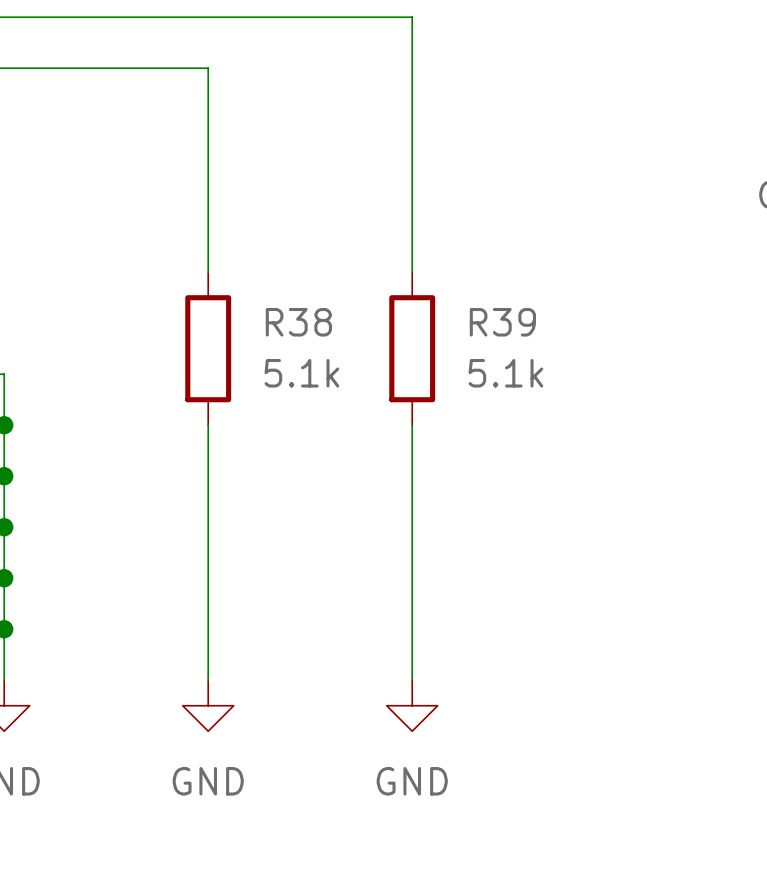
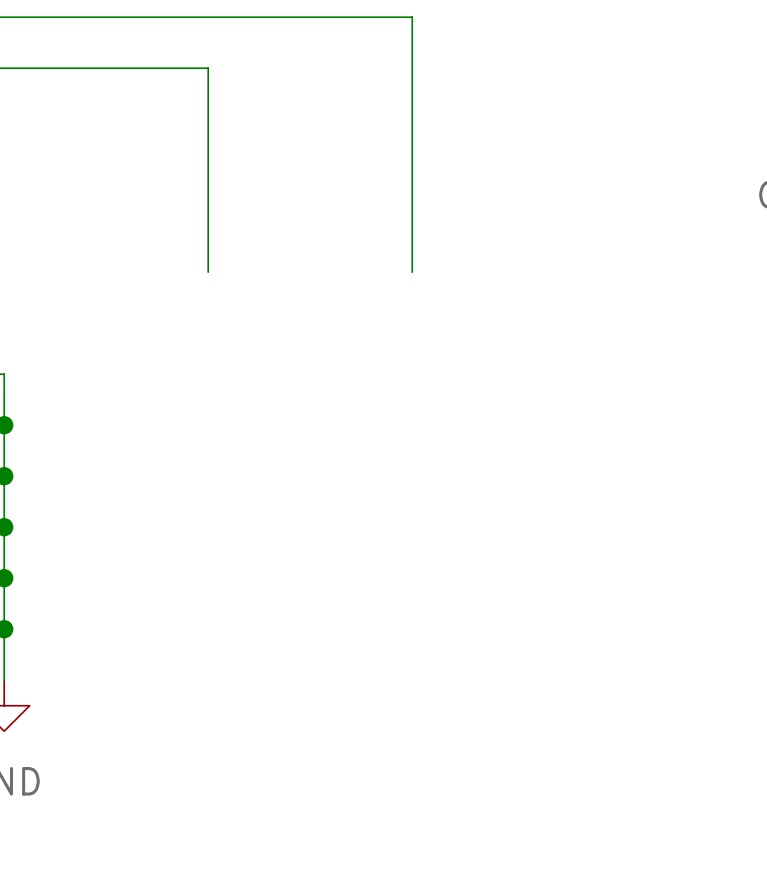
R38: 5.1k (208, 348) -> none
R39: 5.1k (412, 348) -> none
wire: (208, 425) (208, 680) -> none
wire: (412, 425) (412, 680) -> none
power symbol: GND (208, 705) -> none
power symbol: GND (412, 705) -> none

